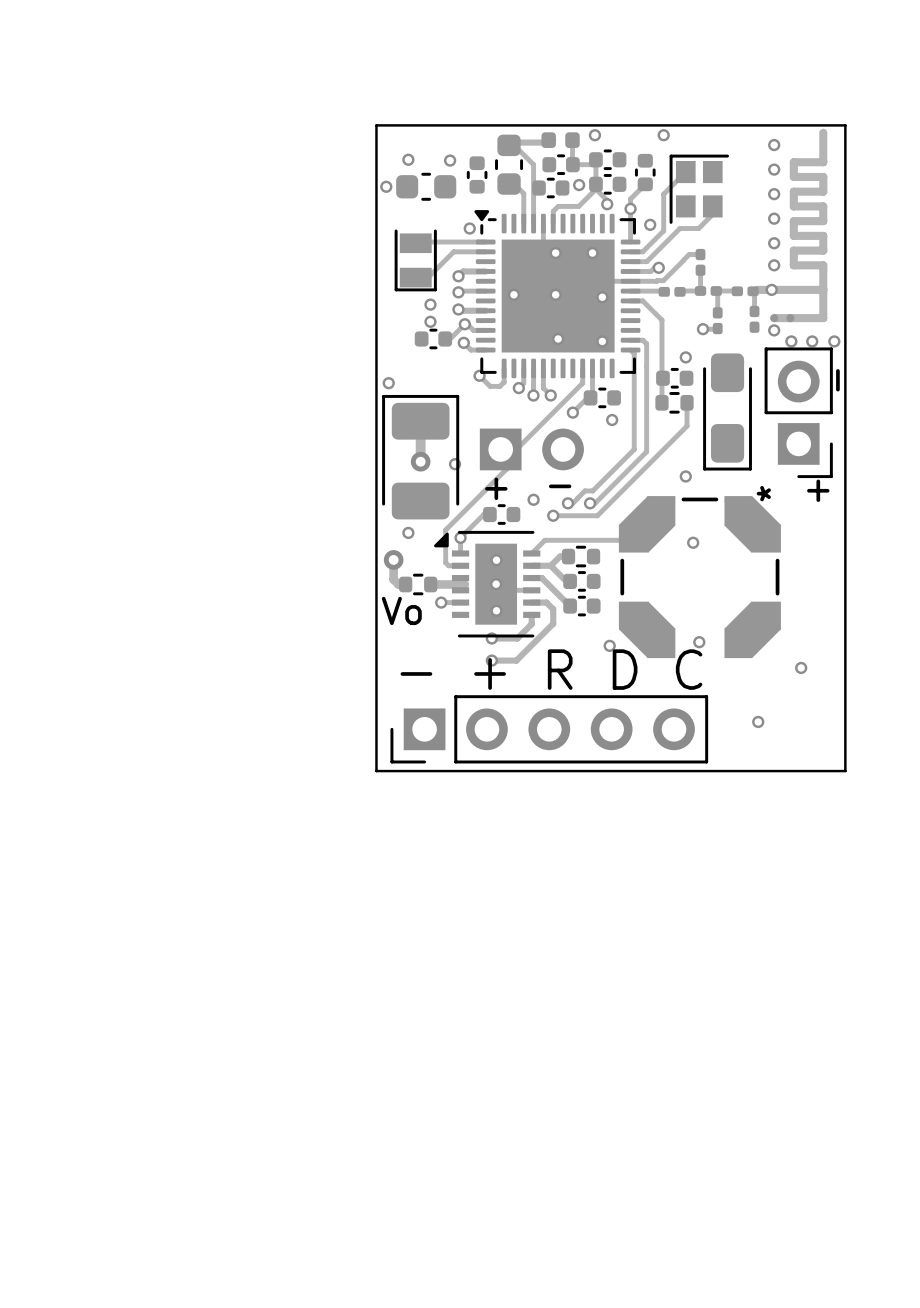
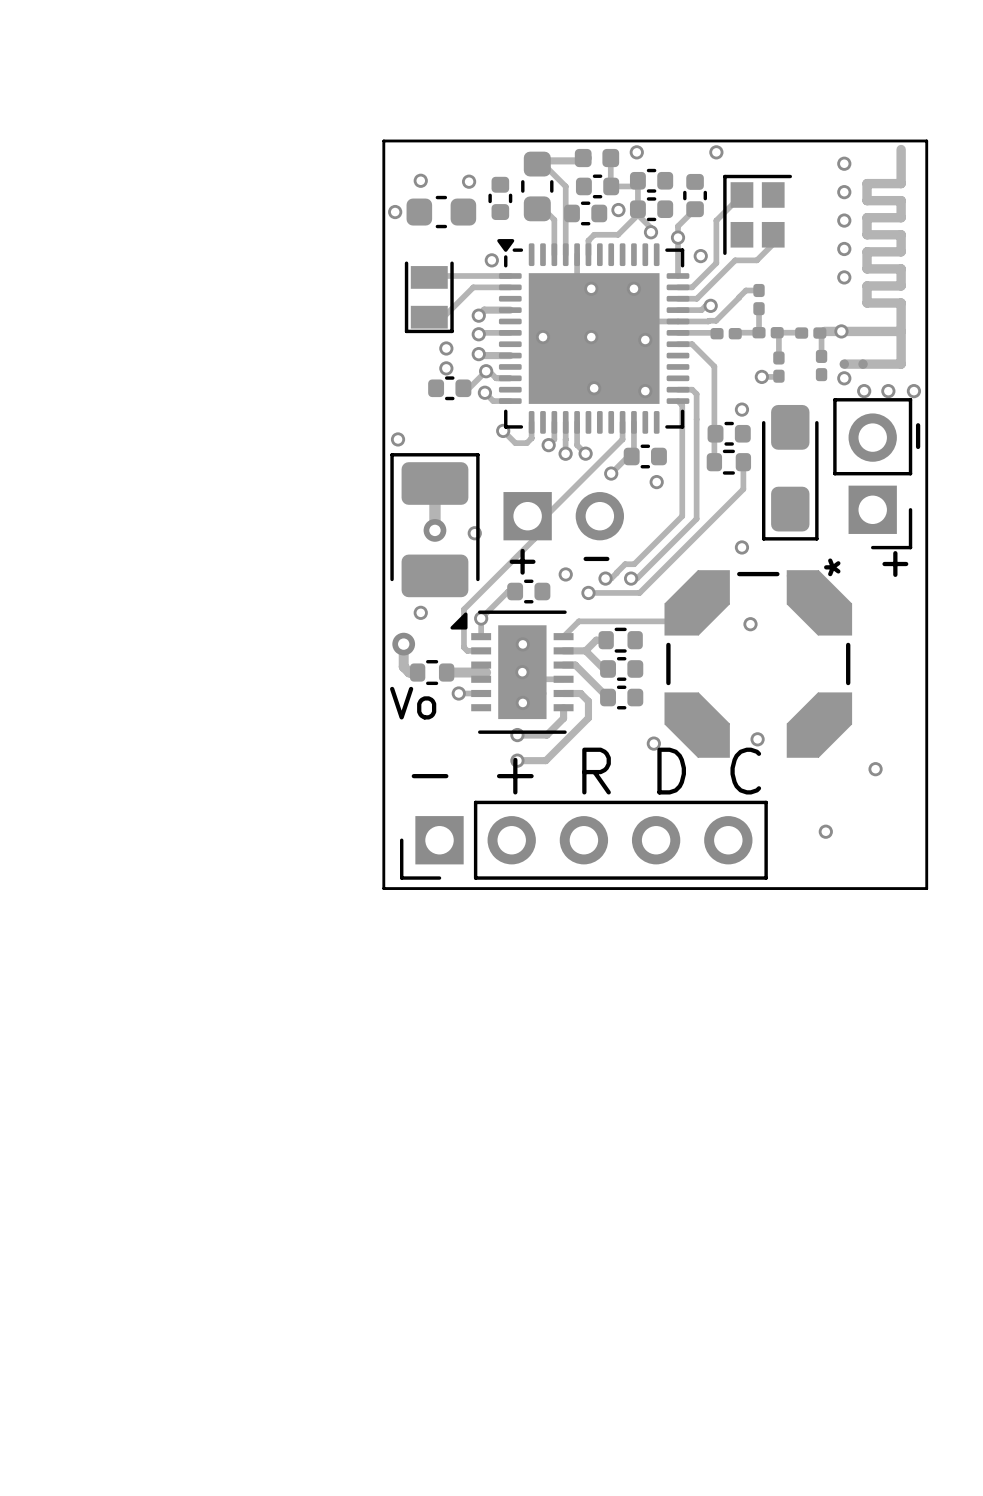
via: (774, 265) -> none

